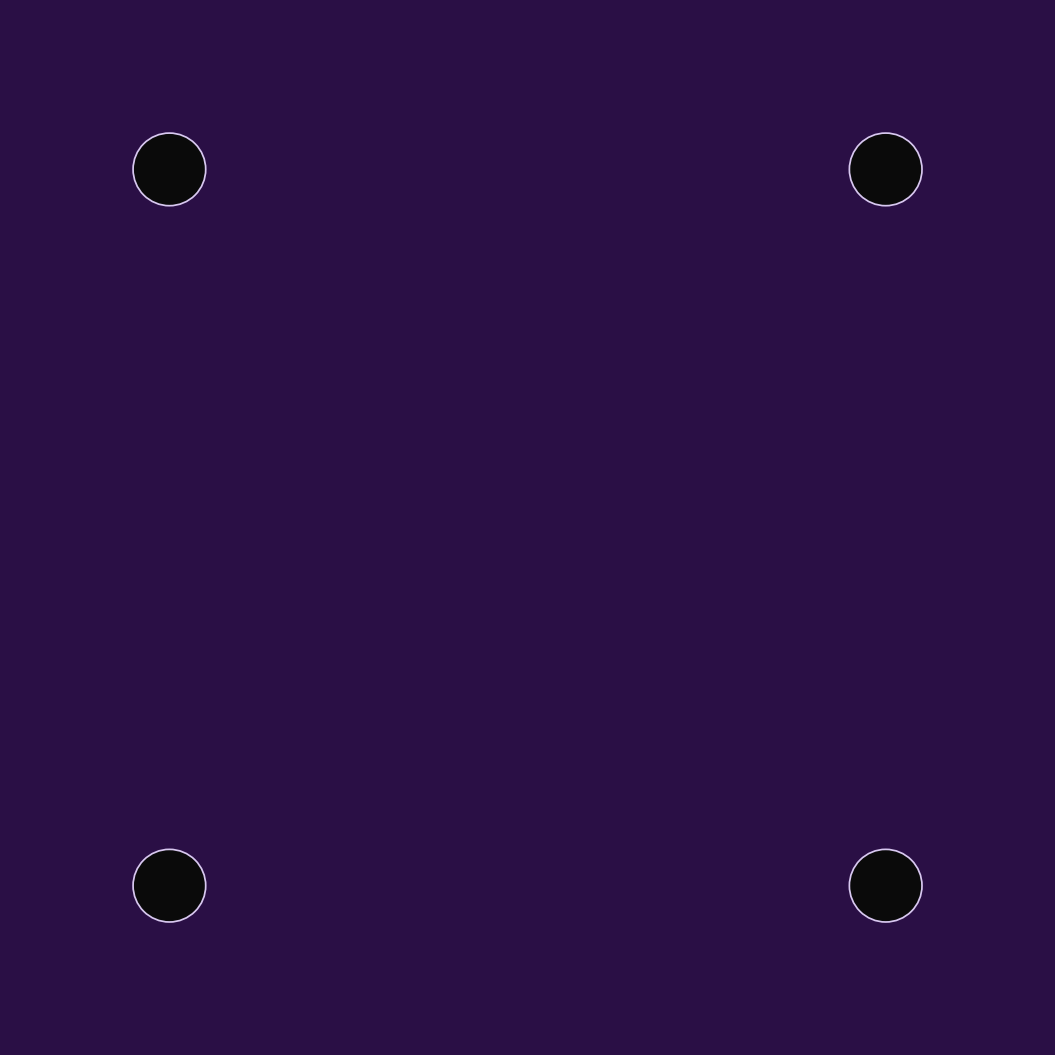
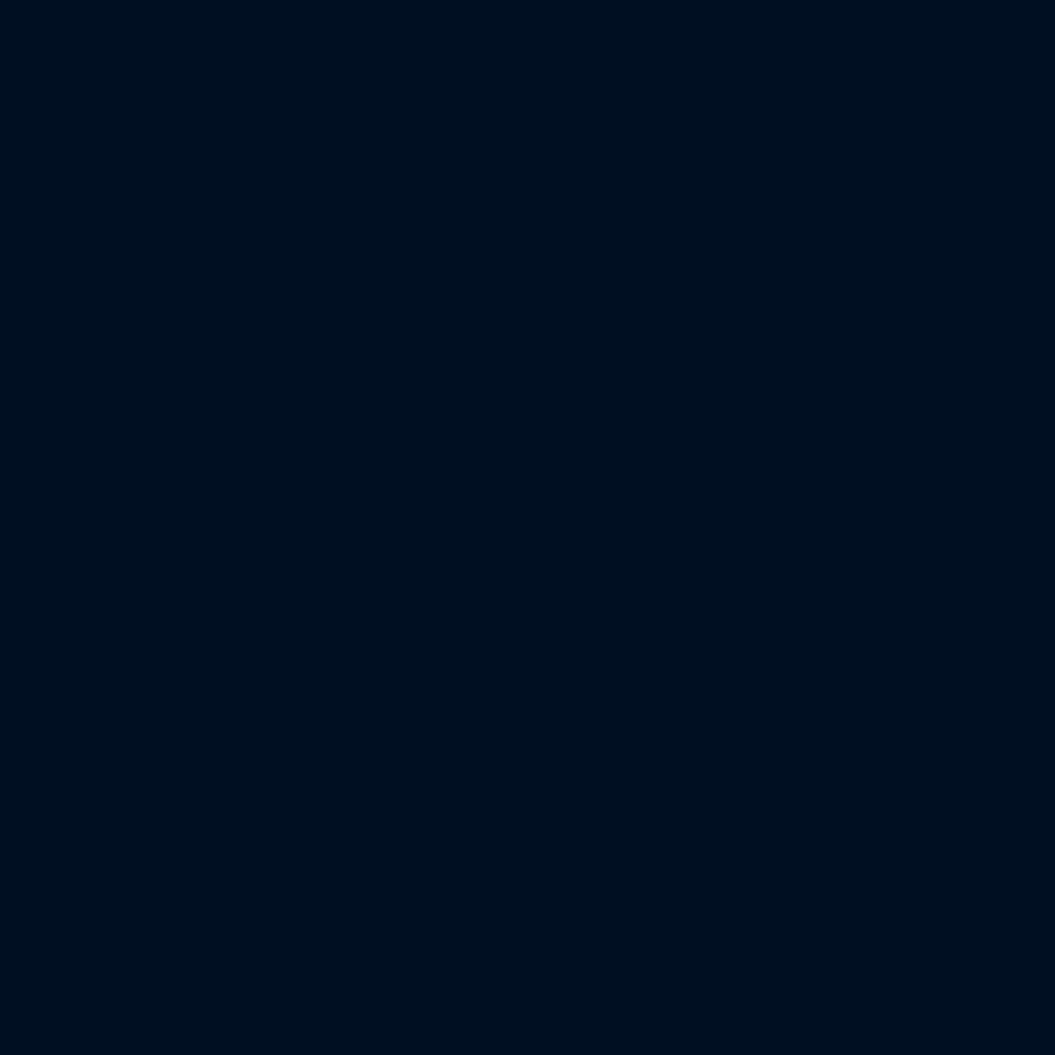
part: (169, 169) -> none
part: (885, 169) -> none
part: (169, 885) -> none
part: (885, 885) -> none

